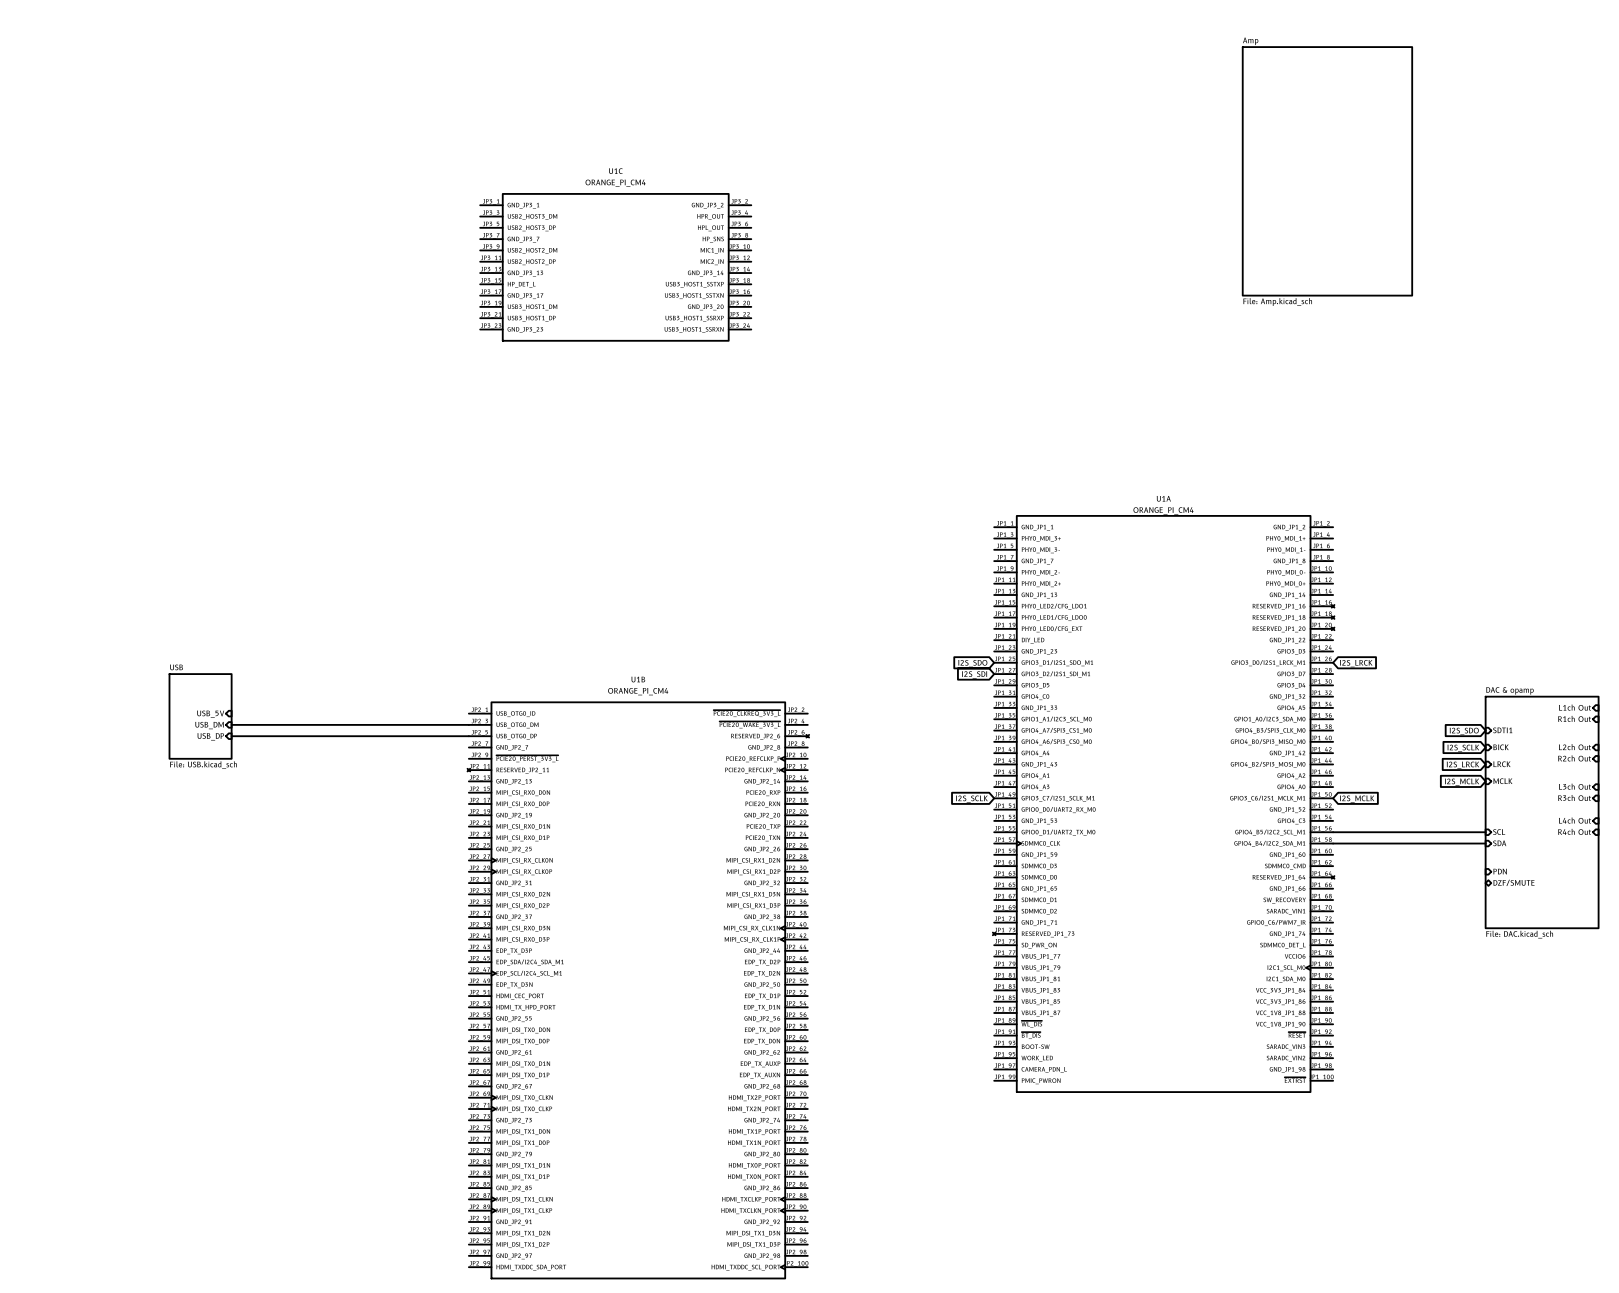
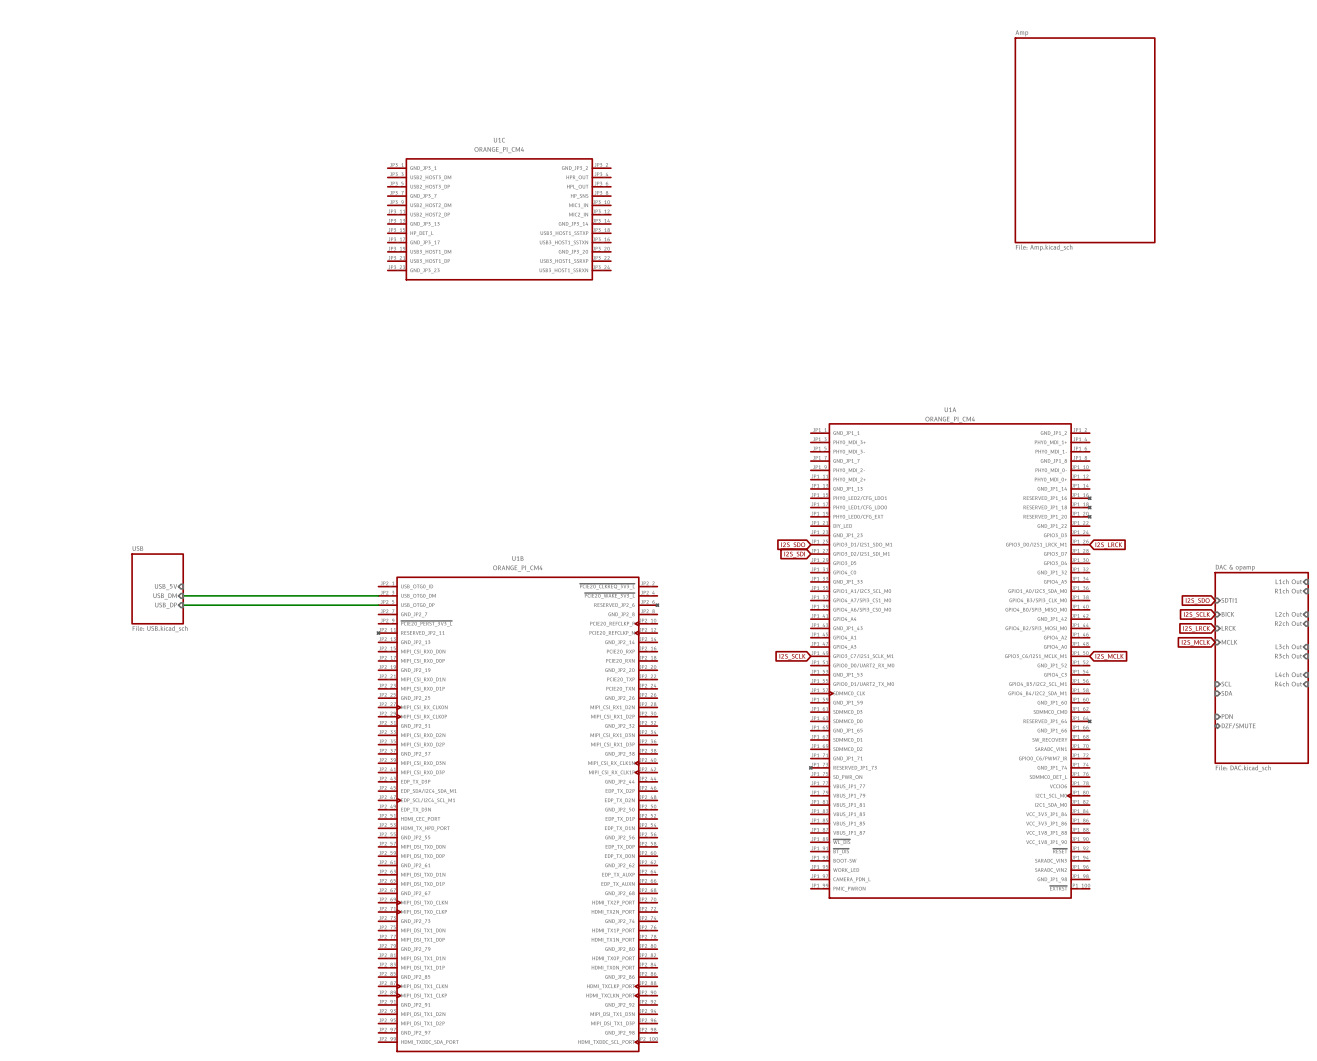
wire: (1333, 832) (1485, 832) -> none
wire: (1333, 843) (1485, 843) -> none

